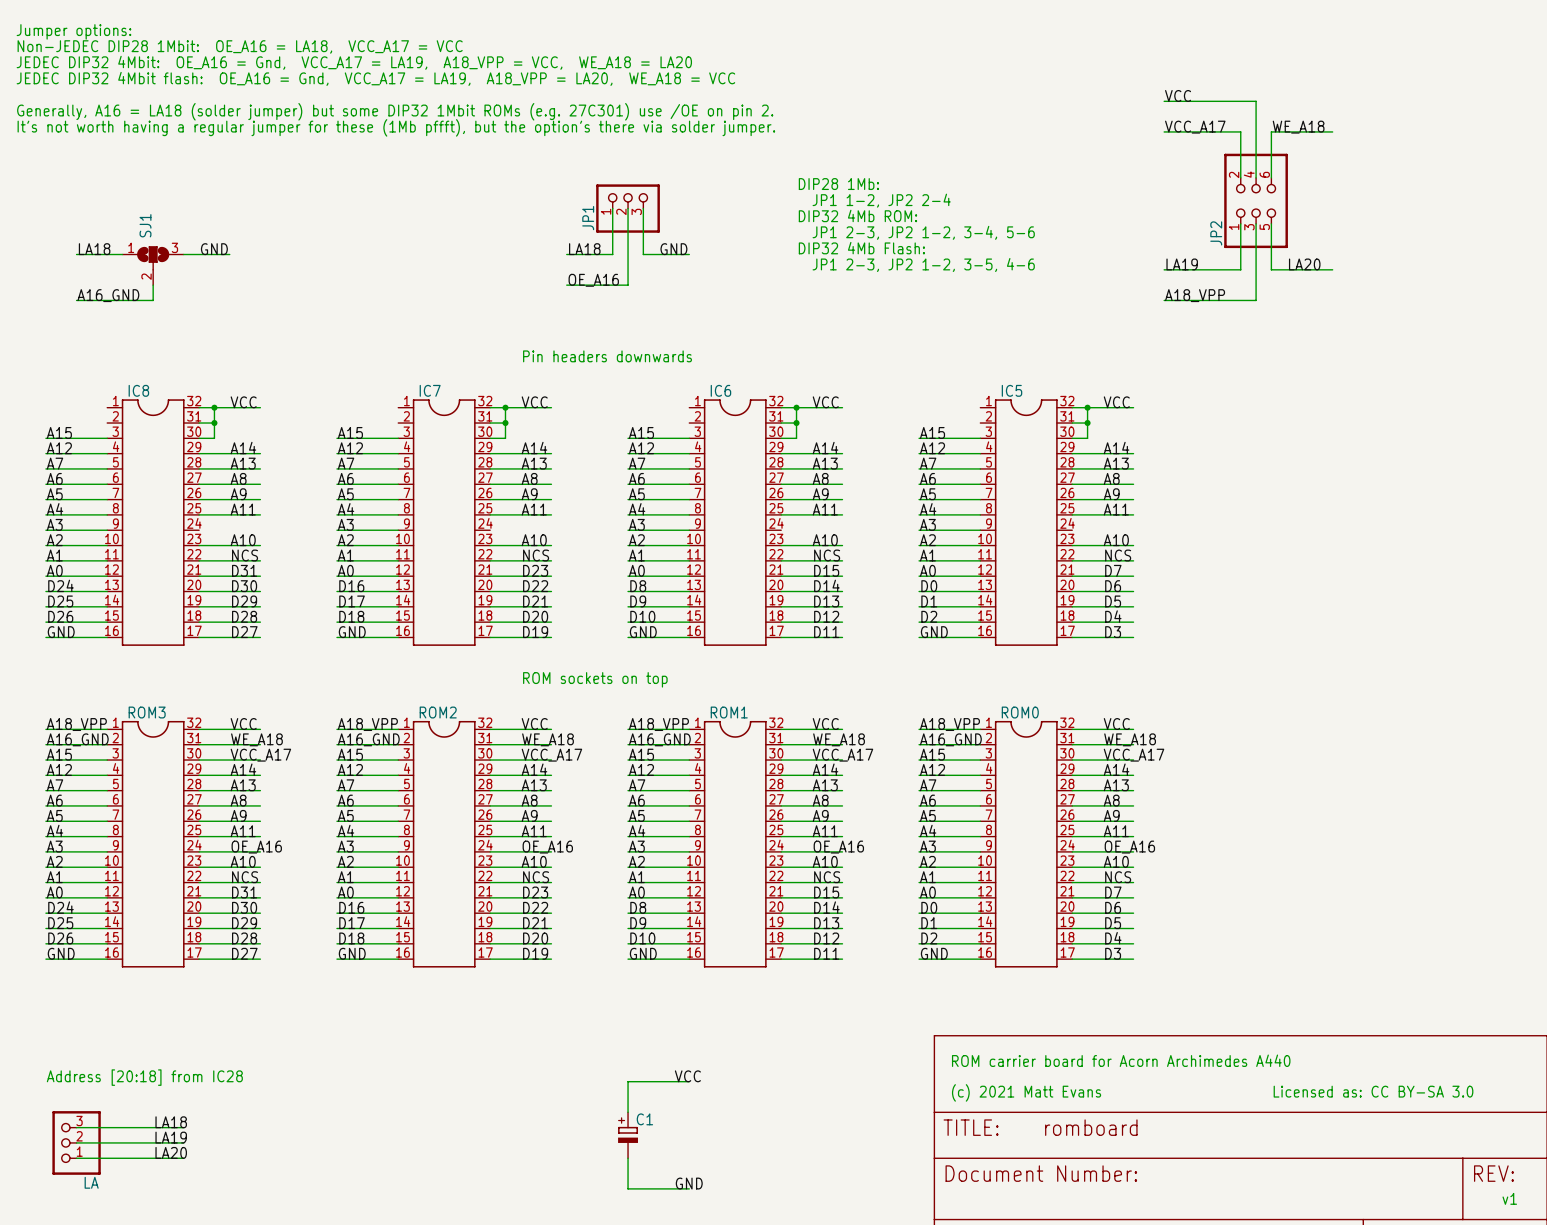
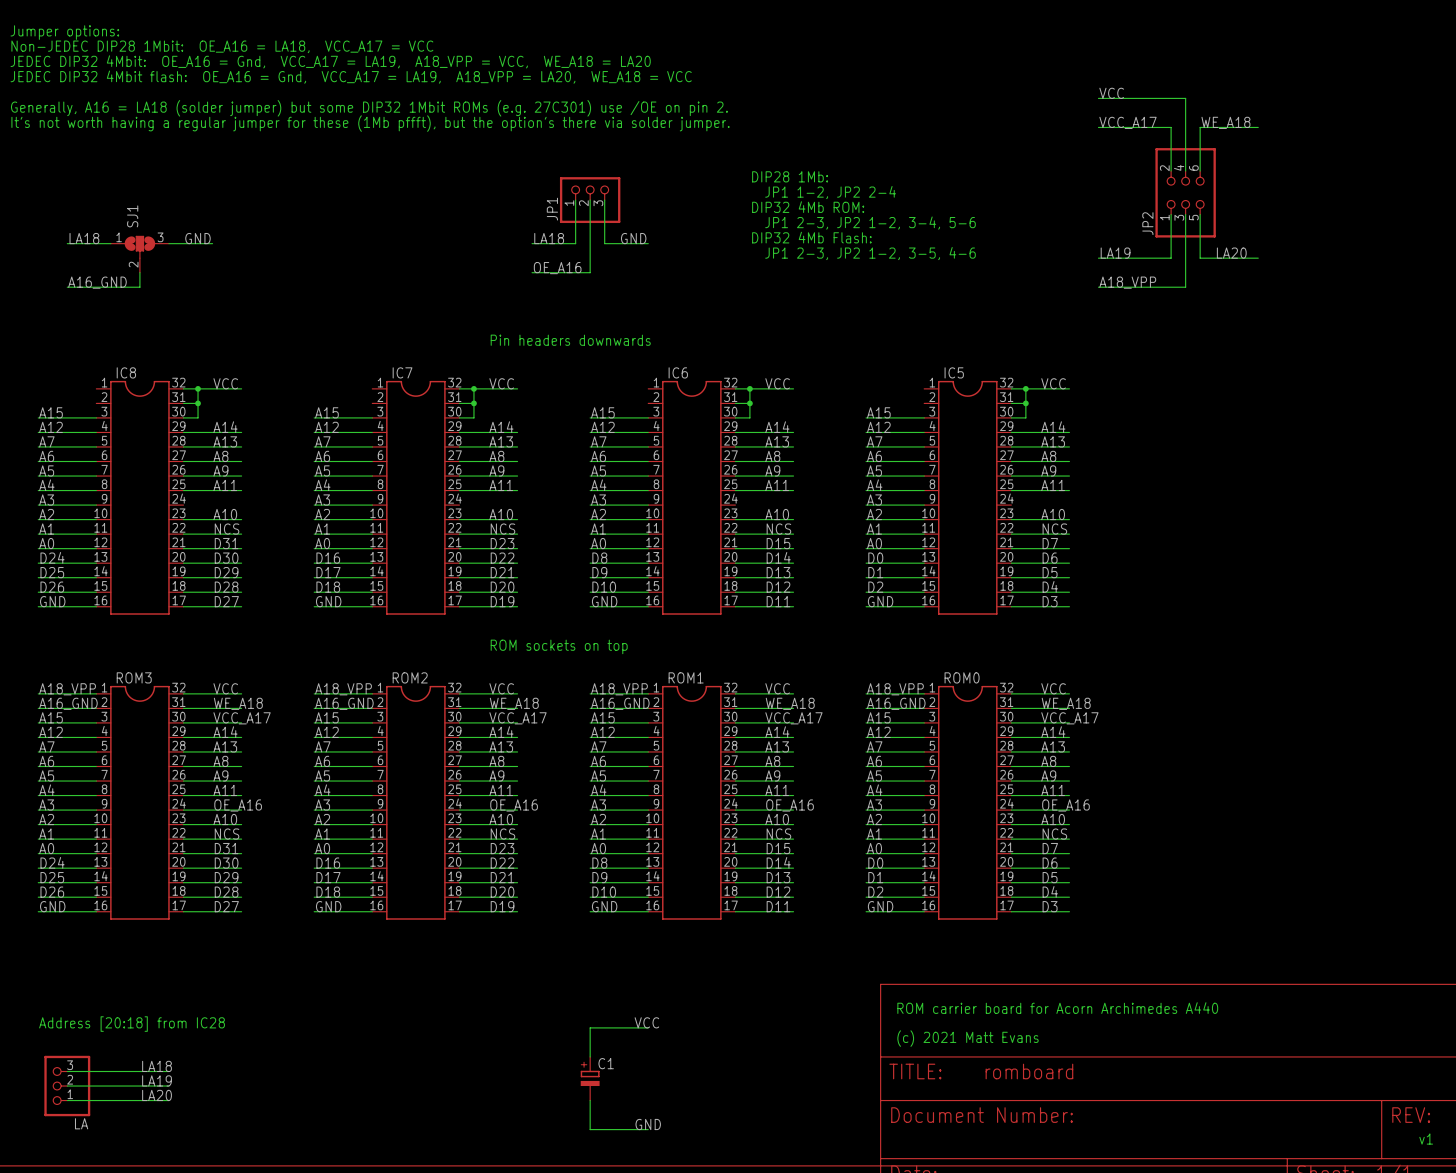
text: Licensed as: CC BY-SA 3.0 (1373, 1091) -> none

